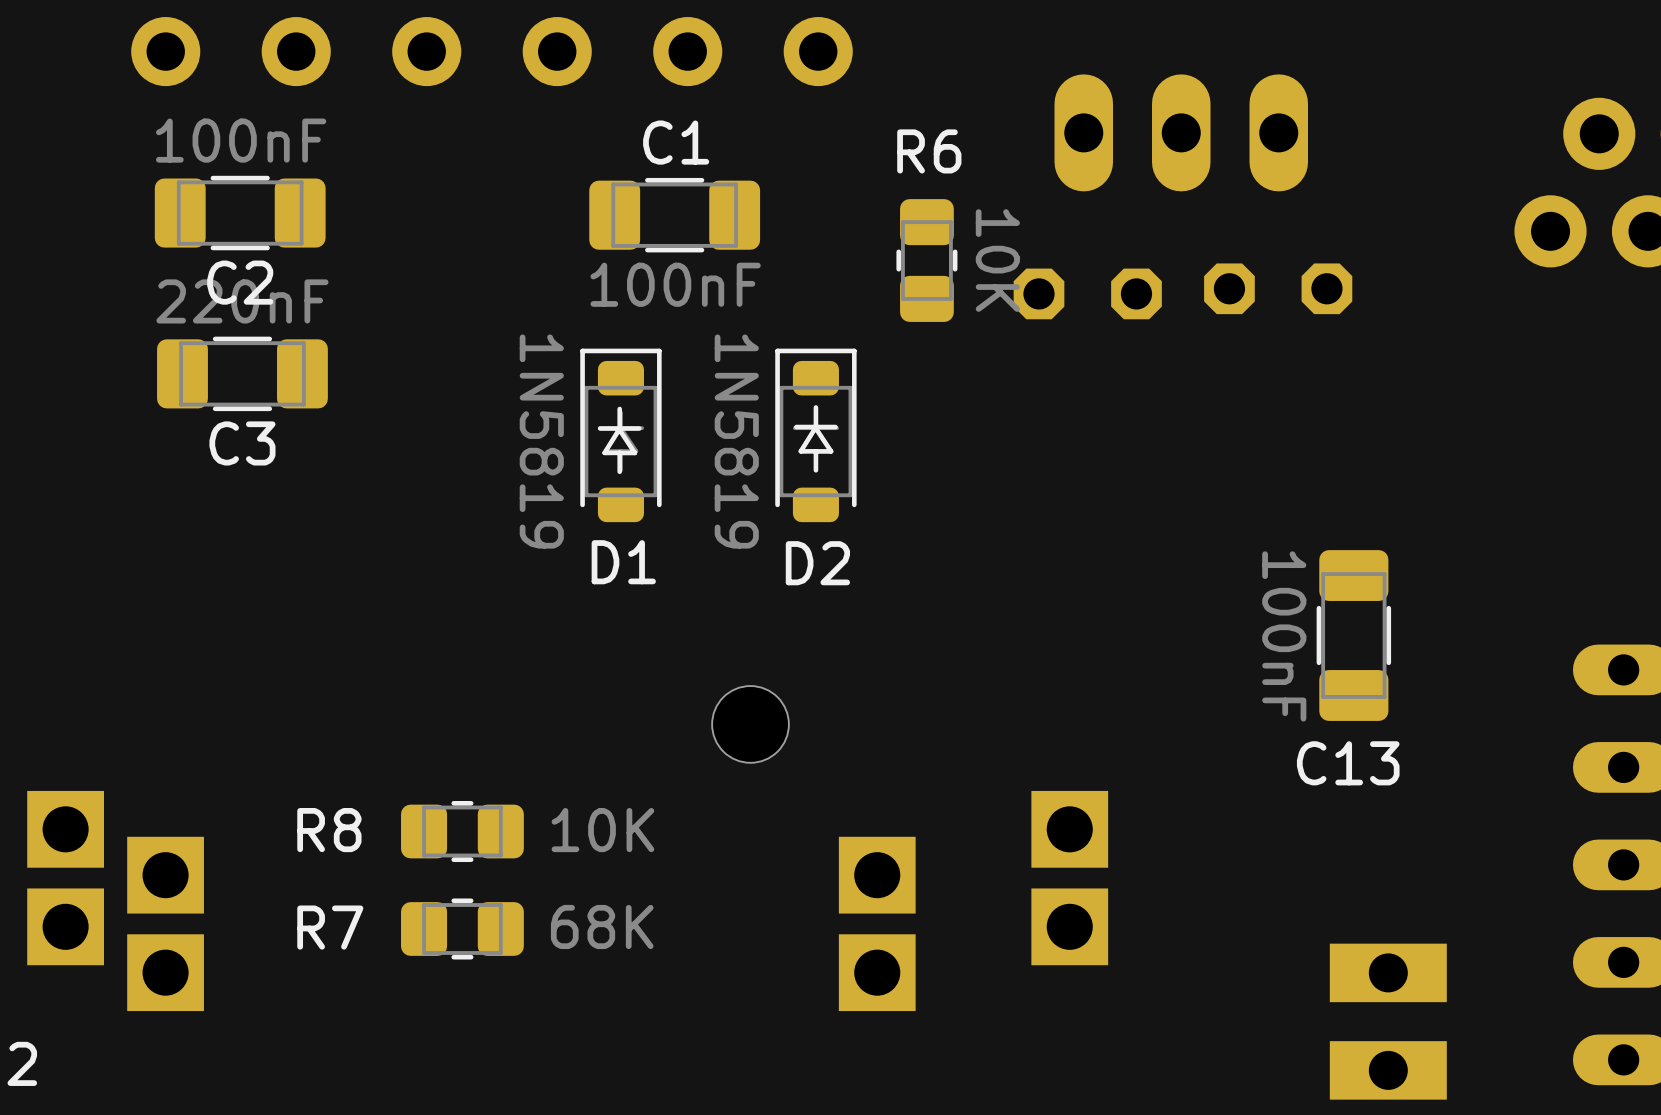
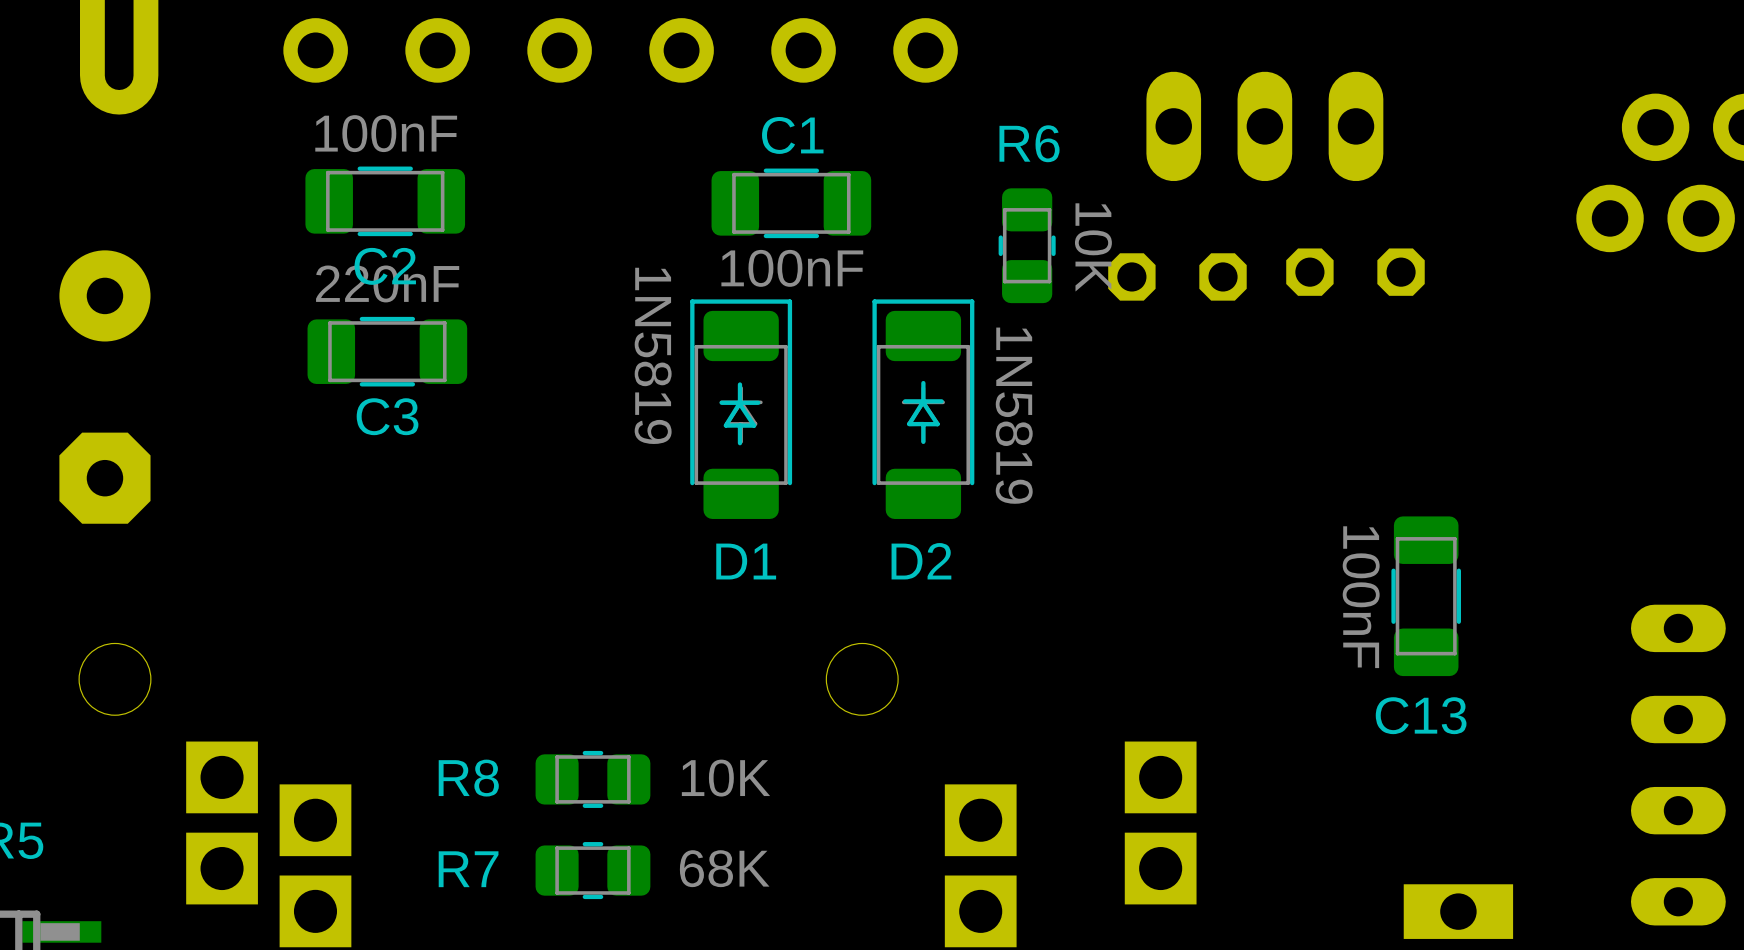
D1 footprint: [580, 348, 662, 523] -> [690, 299, 793, 519]
D2 footprint: [775, 348, 857, 523] -> [872, 299, 975, 519]
D1 value position: 1N5819 (541, 441) -> 1N5819 (653, 355)
D2 value position: 1N5819 (736, 441) -> 1N5819 (1014, 415)
D1 name position: D1 (623, 562) -> D1 (746, 561)
D2 name position: D2 (817, 563) -> D2 (921, 561)

